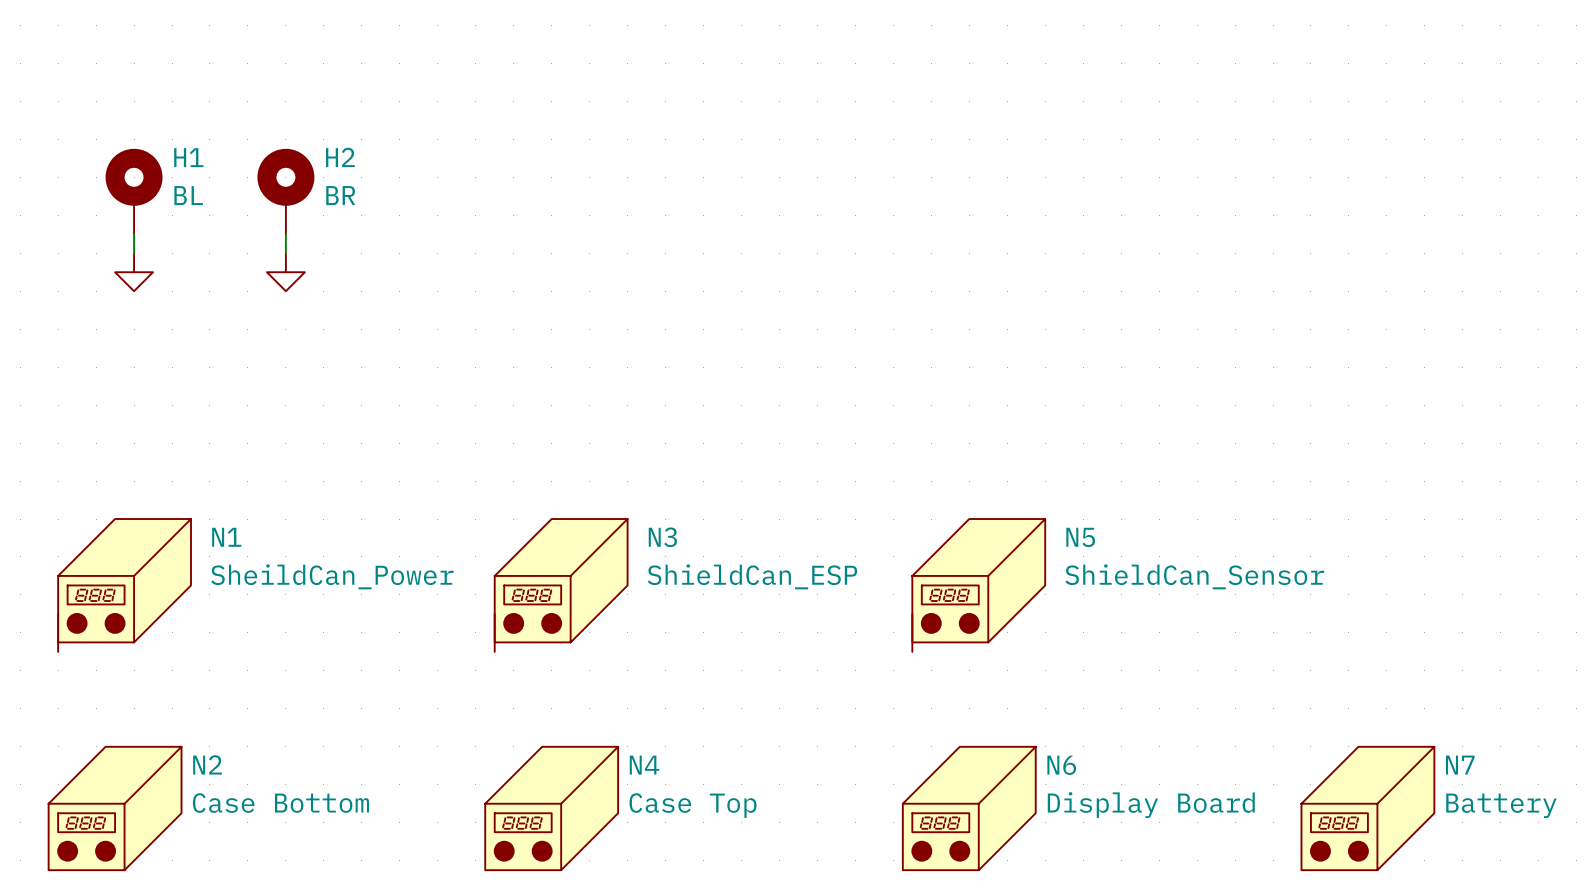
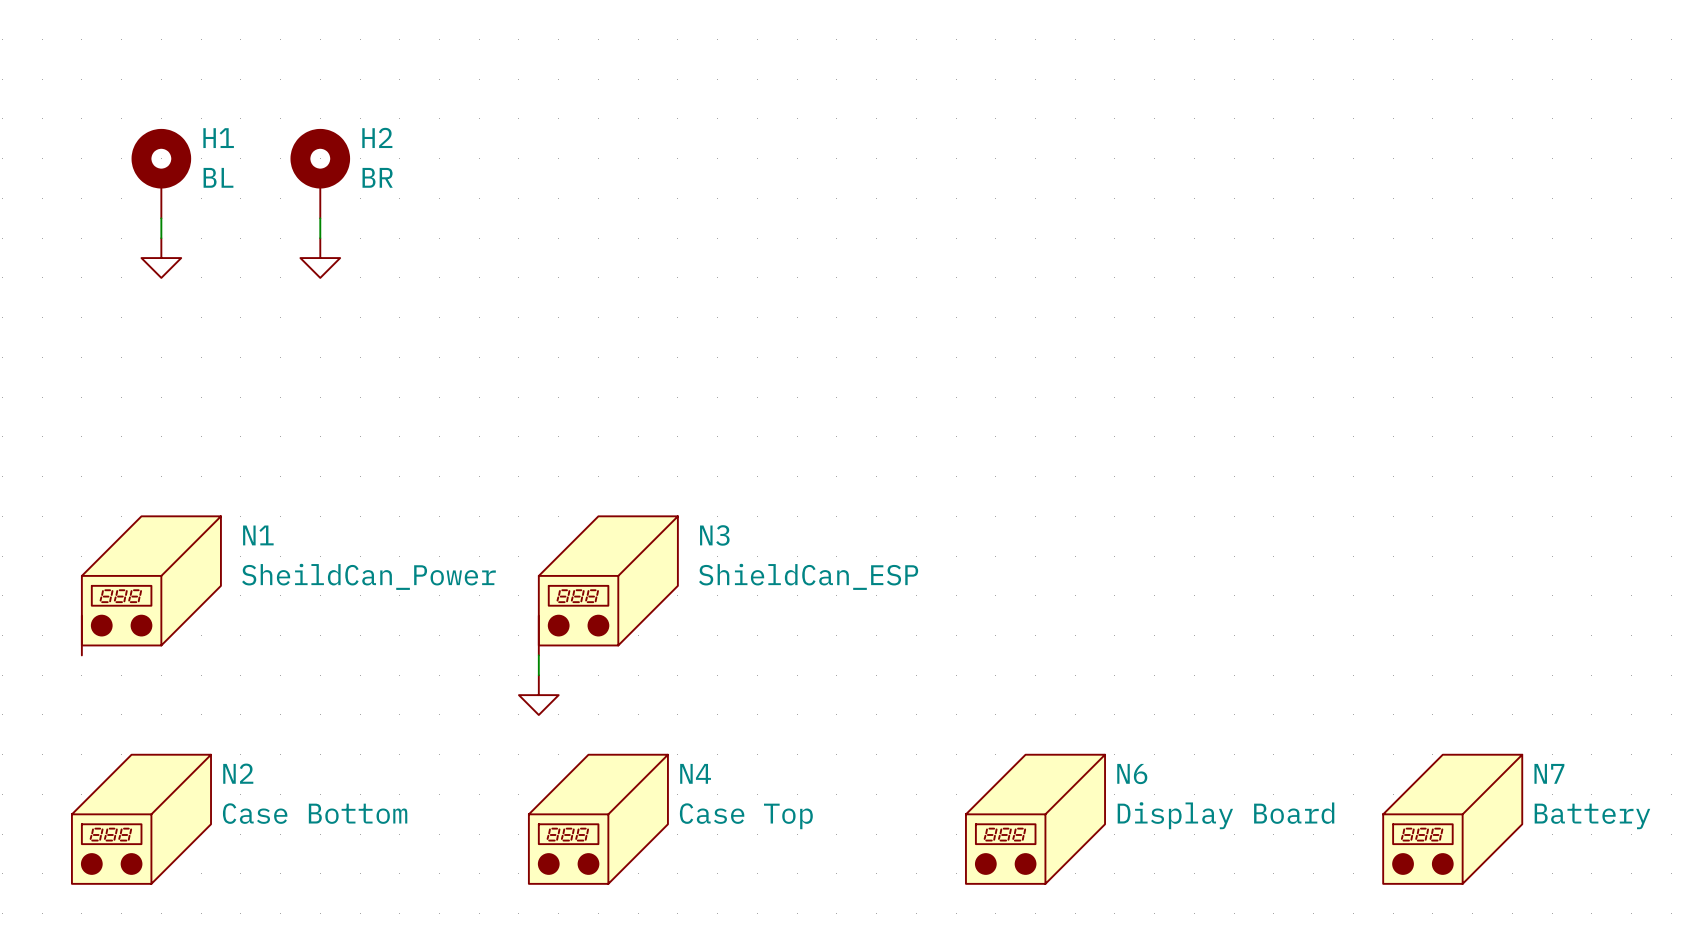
N5: ShieldCan_Sensor (978, 585) -> none
wire: none -> (538, 655) (538, 675)
power symbol: none -> (538, 695)

